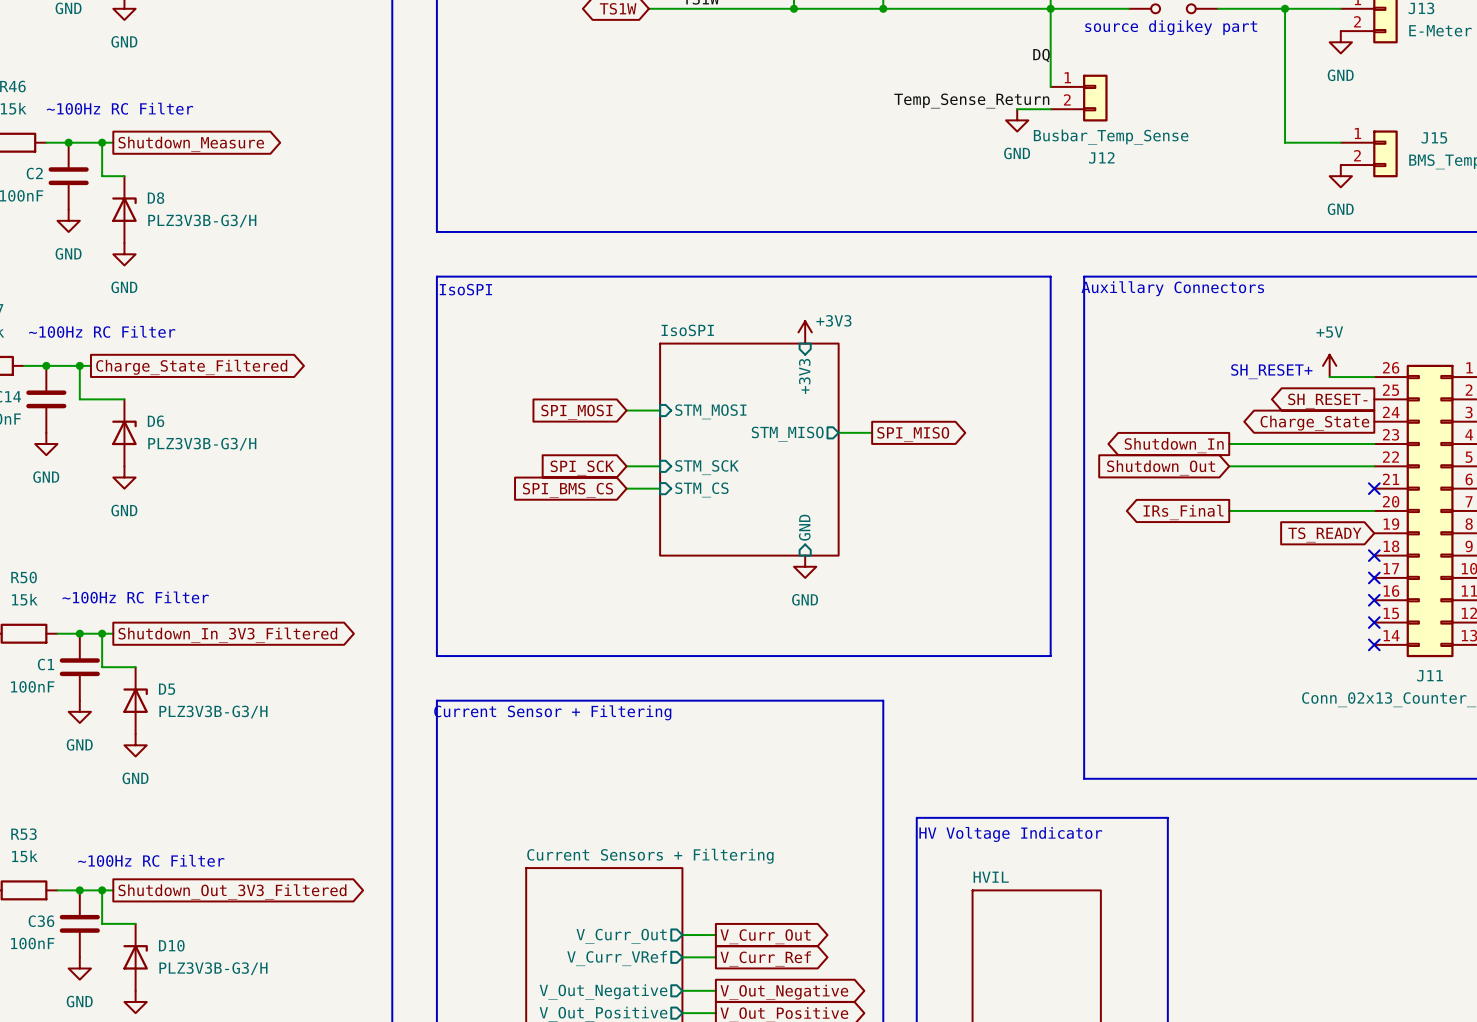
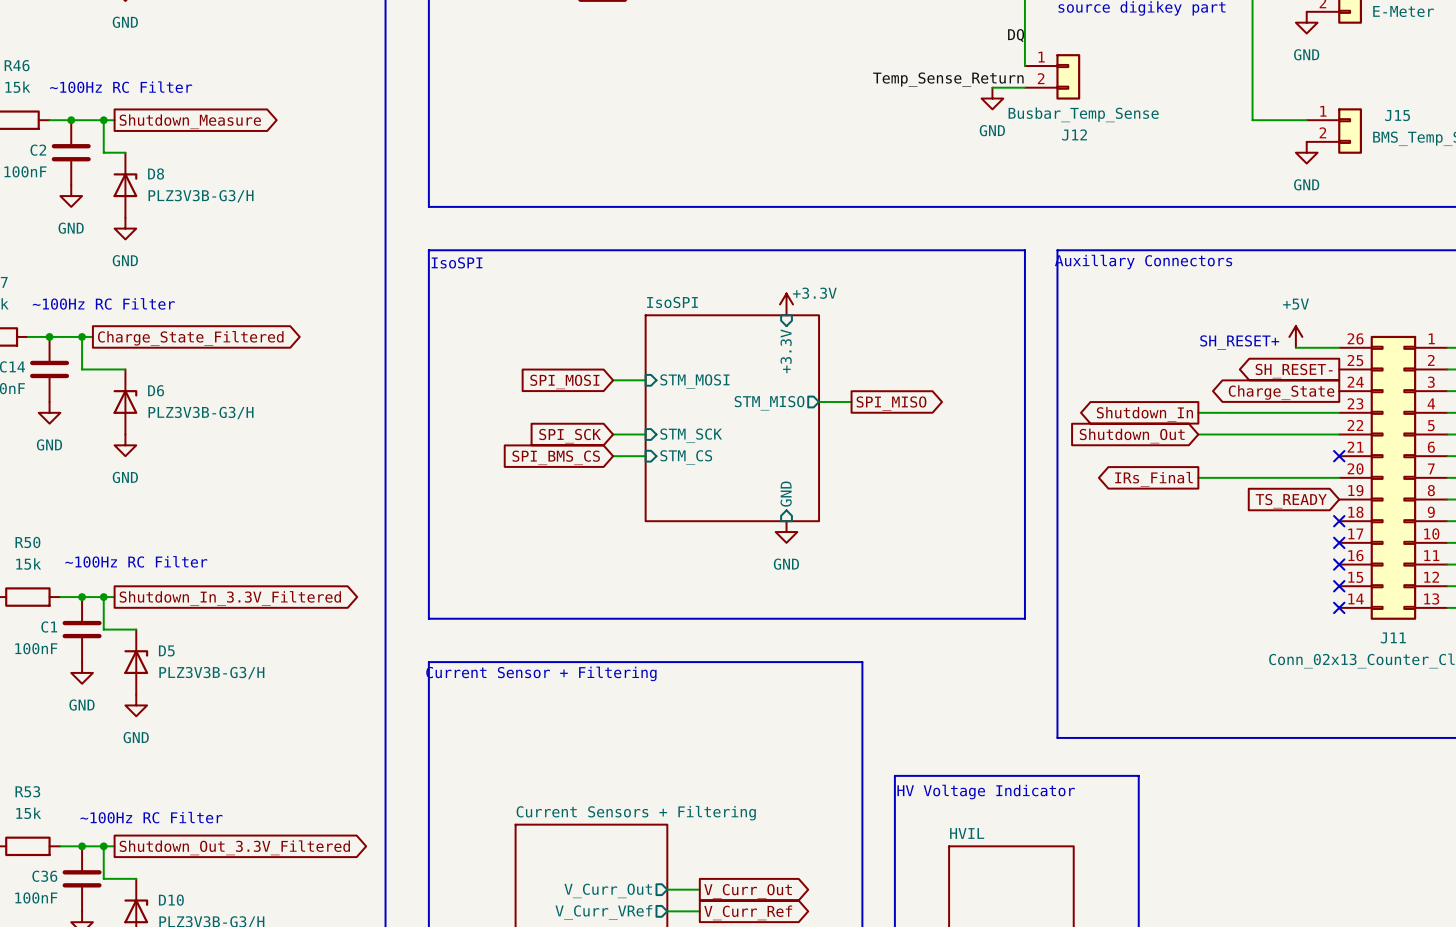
power symbol: +3V3 (805, 332) -> +3.3V (786, 304)
sheet pin: +3V3 (804, 376) -> +3.3V (786, 351)
global label: Shutdown_In_3V3_Filtered (227, 635) -> Shutdown_In_3.3V_Filtered (230, 598)
global label: Shutdown_Out_3V3_Filtered (232, 891) -> Shutdown_Out_3.3V_Filtered (234, 847)

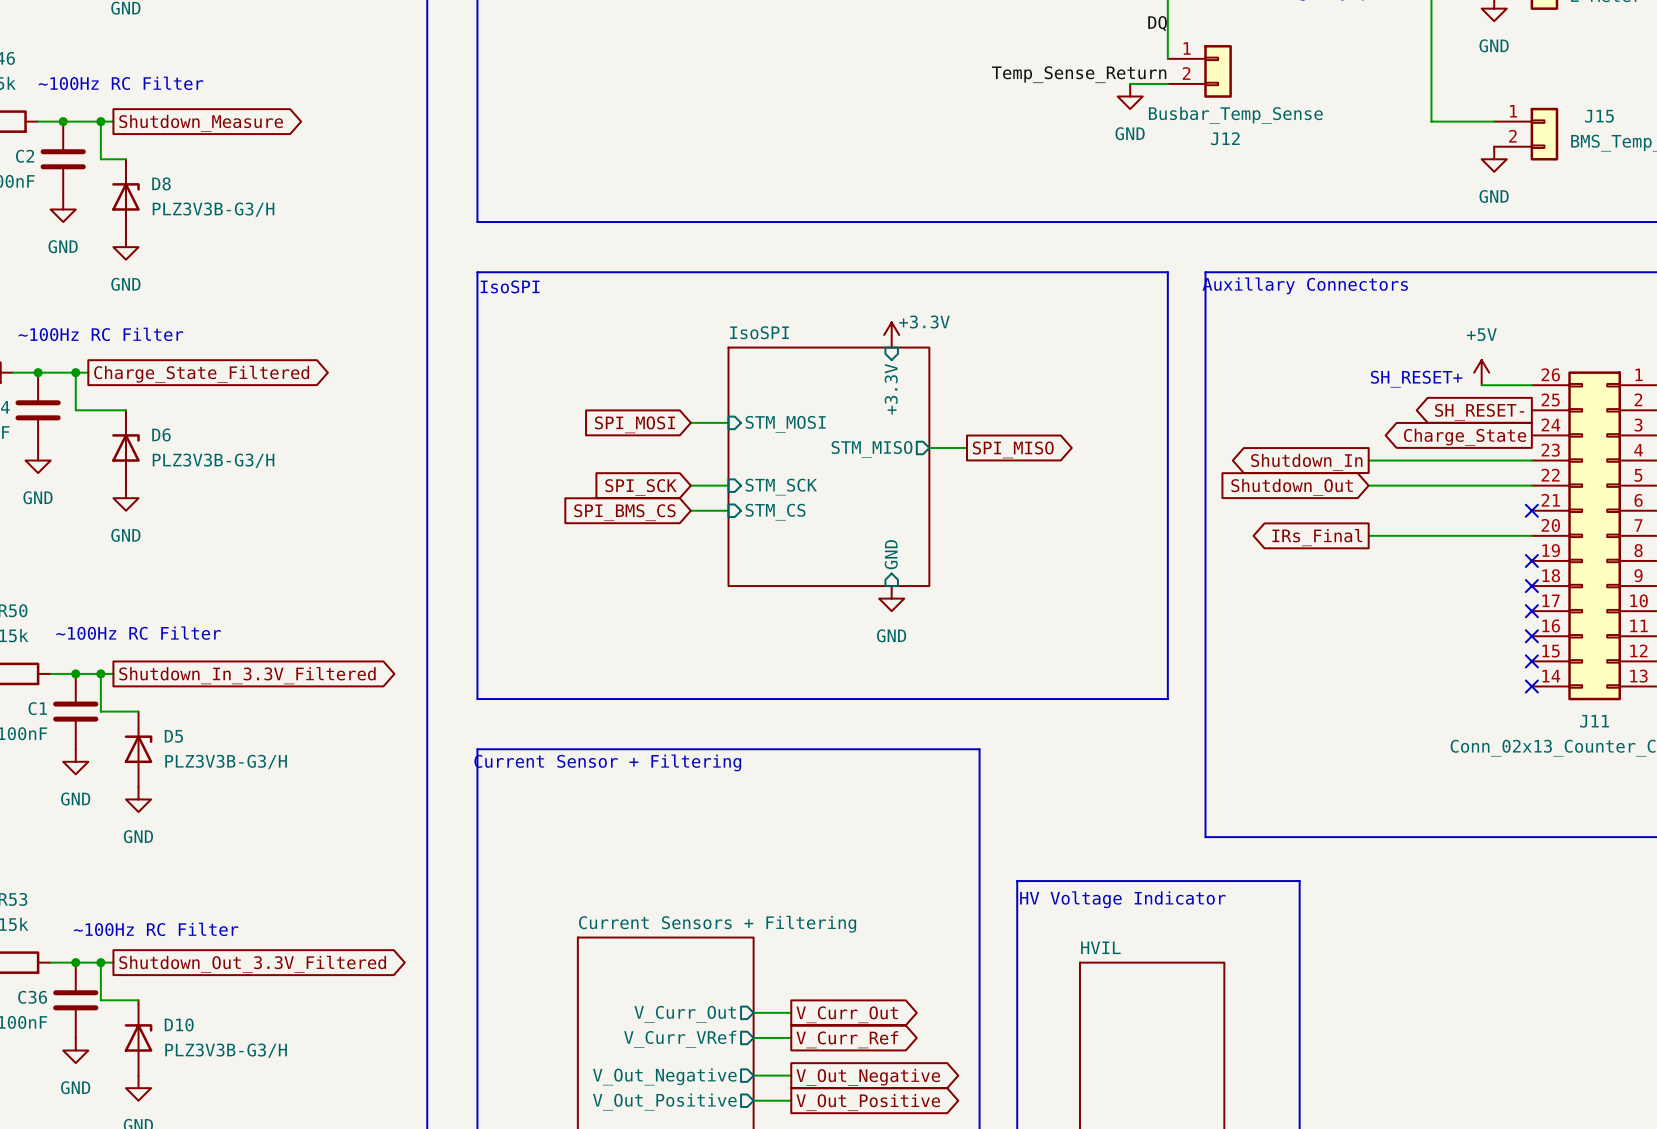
no-connect mark: none -> (1531, 560)
global label: TS_READY (1291, 501) -> none

